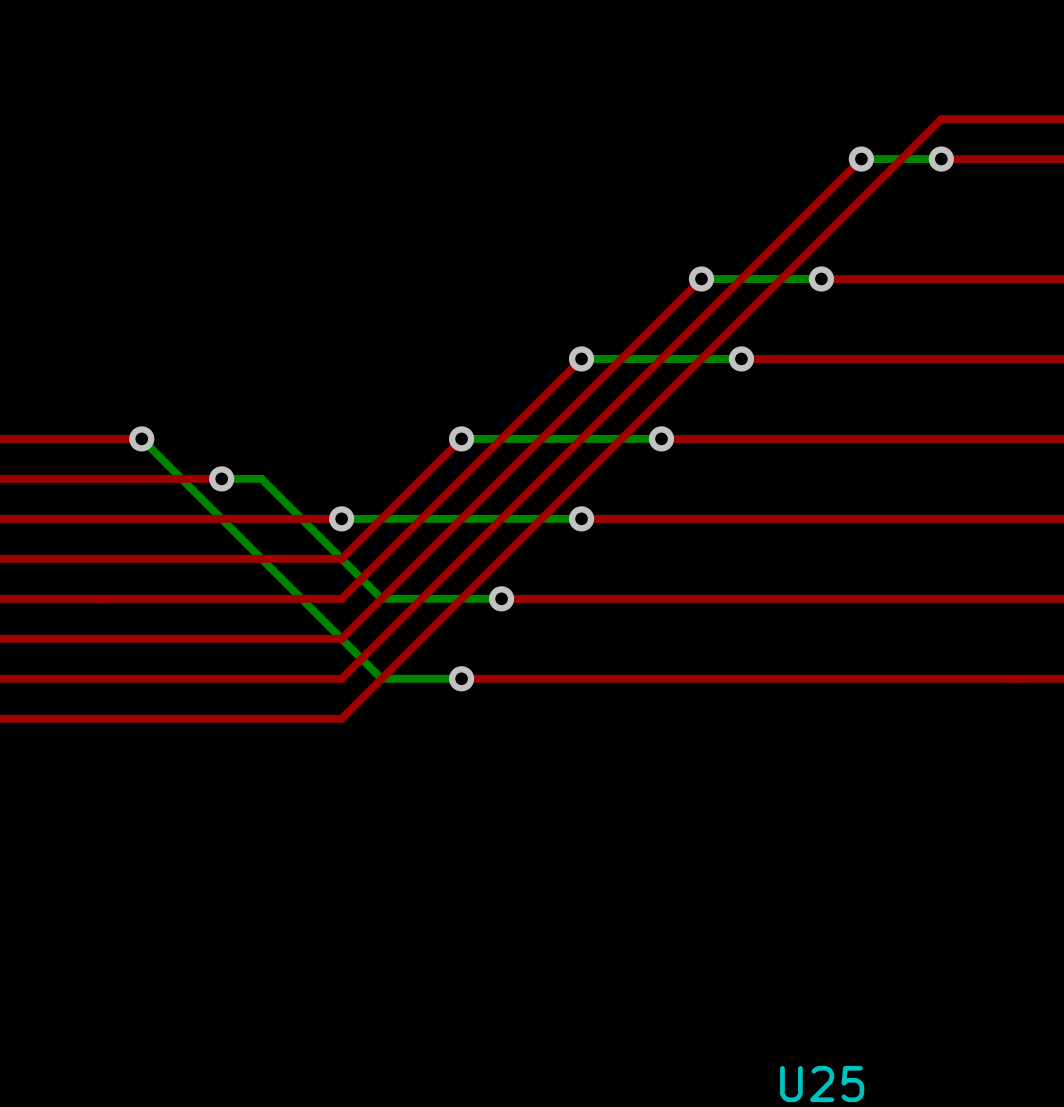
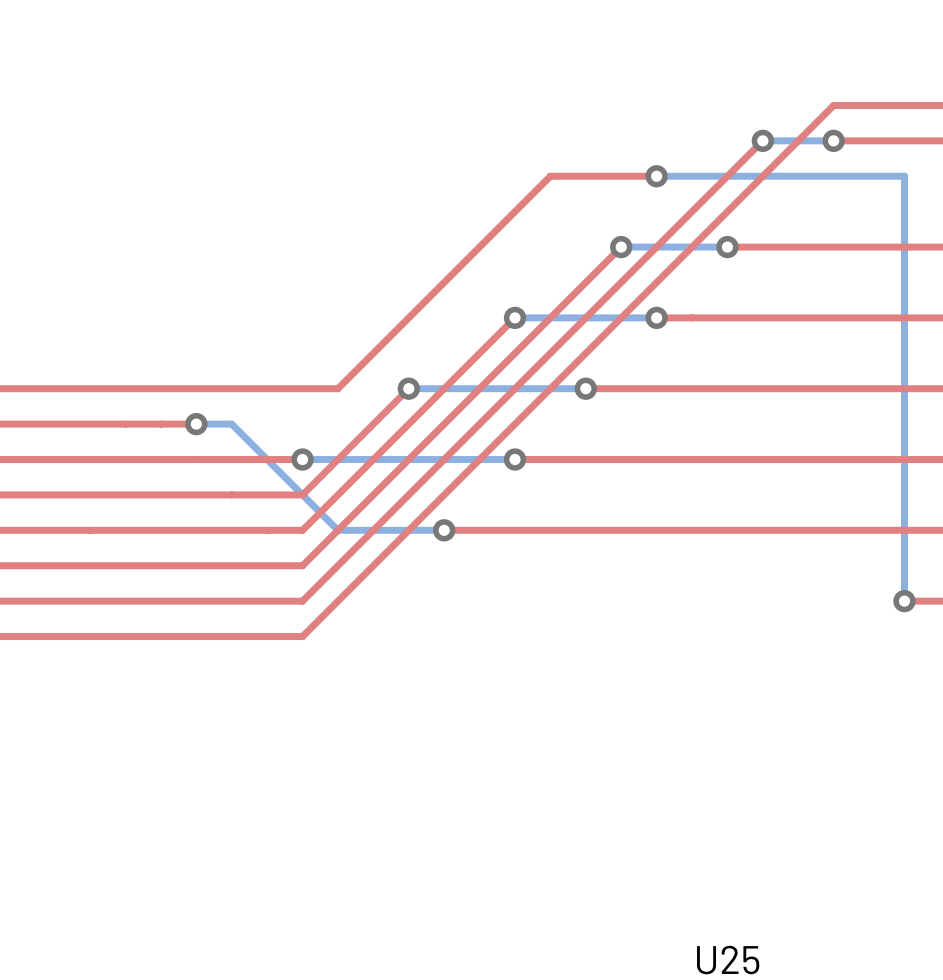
top track: none -> (656, 176) (550, 176) (337, 388) (125, 388)
bottom track: none -> (656, 176) (904, 176) (904, 601)
via: none -> (656, 176)
bottom track: (141, 438) (381, 678) (461, 678) -> none
via: (141, 438) -> none
top track: (461, 678) (1021, 678) -> none
via: (461, 678) -> none
via: none -> (904, 601)

